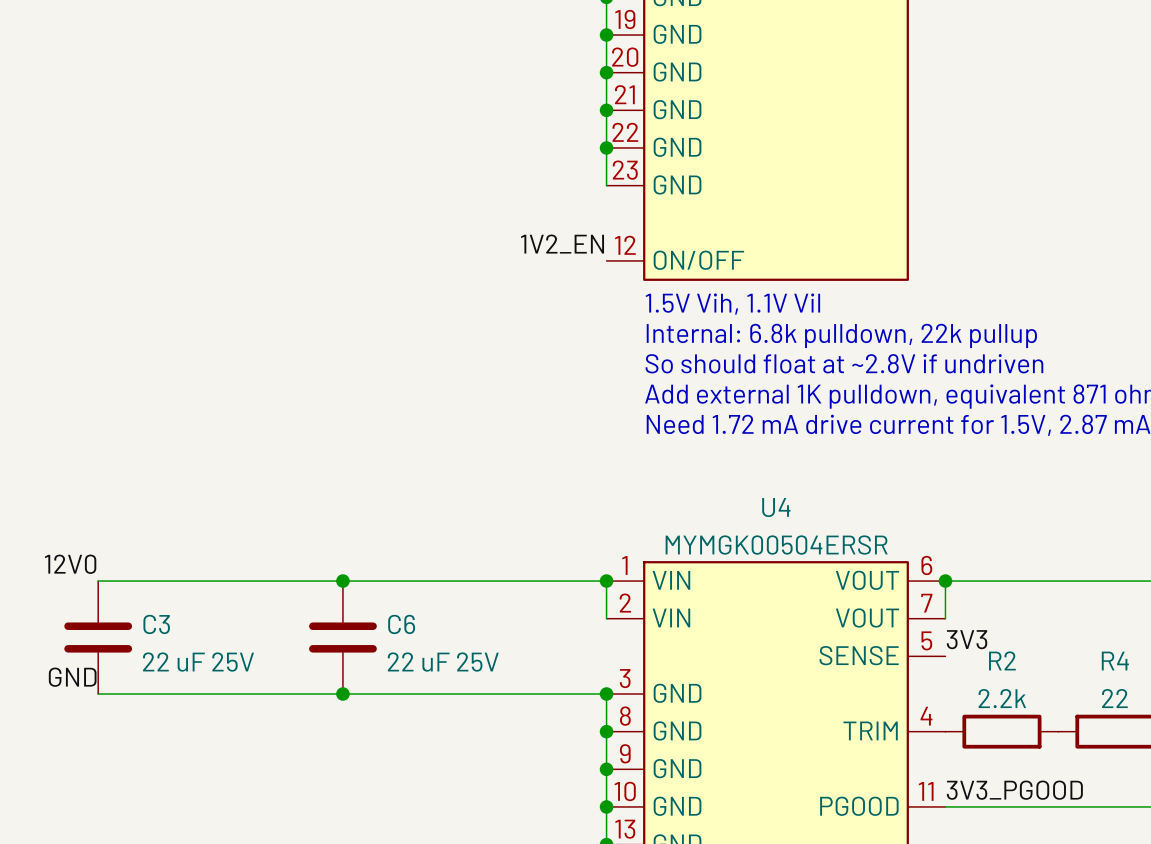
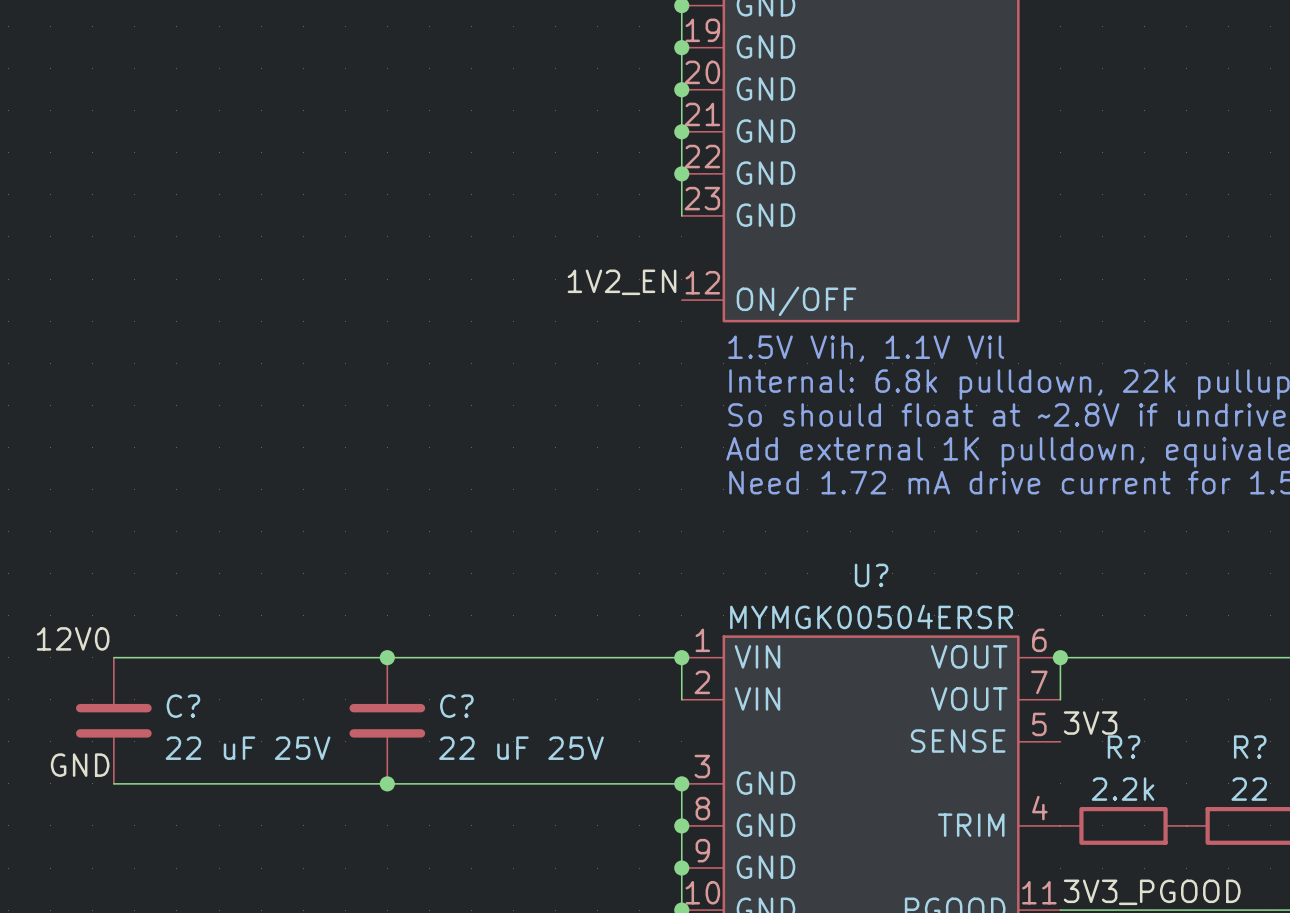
U4 name: U4 (776, 507) -> U? (871, 575)
C3 name: C3 (156, 624) -> C? (183, 706)
C6 name: C6 (401, 624) -> C? (456, 706)
R2 name: R2 (1002, 660) -> R? (1124, 747)
R4 name: R4 (1115, 661) -> R? (1250, 747)

